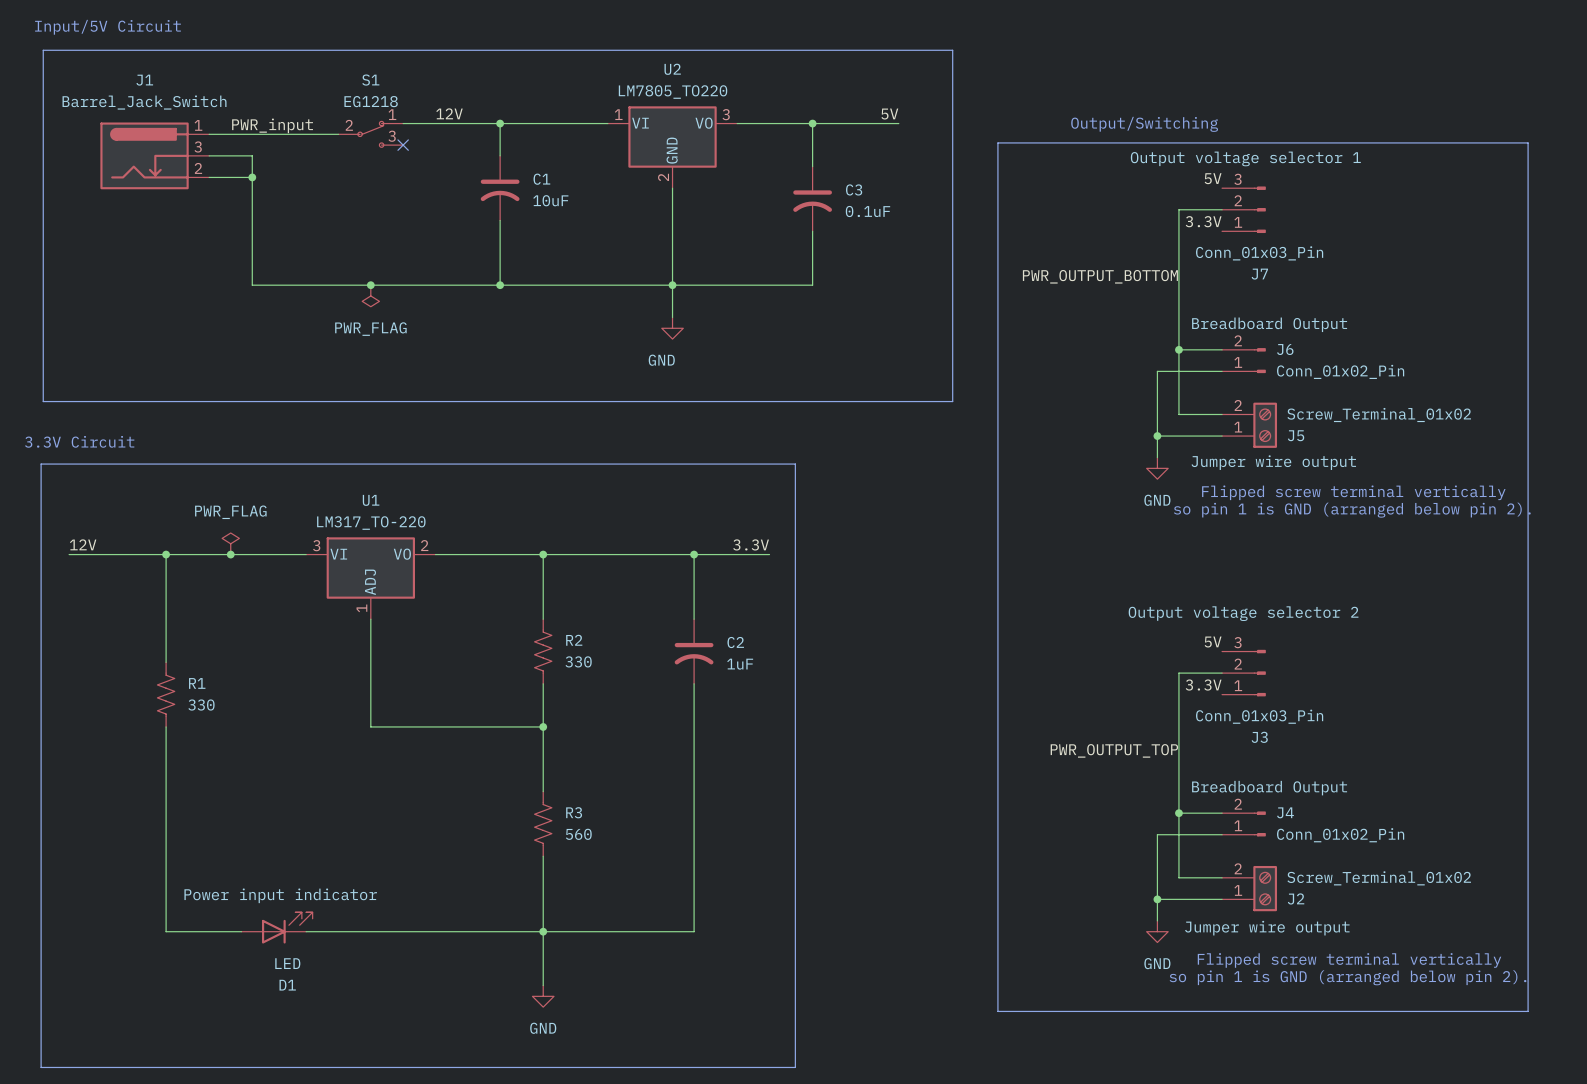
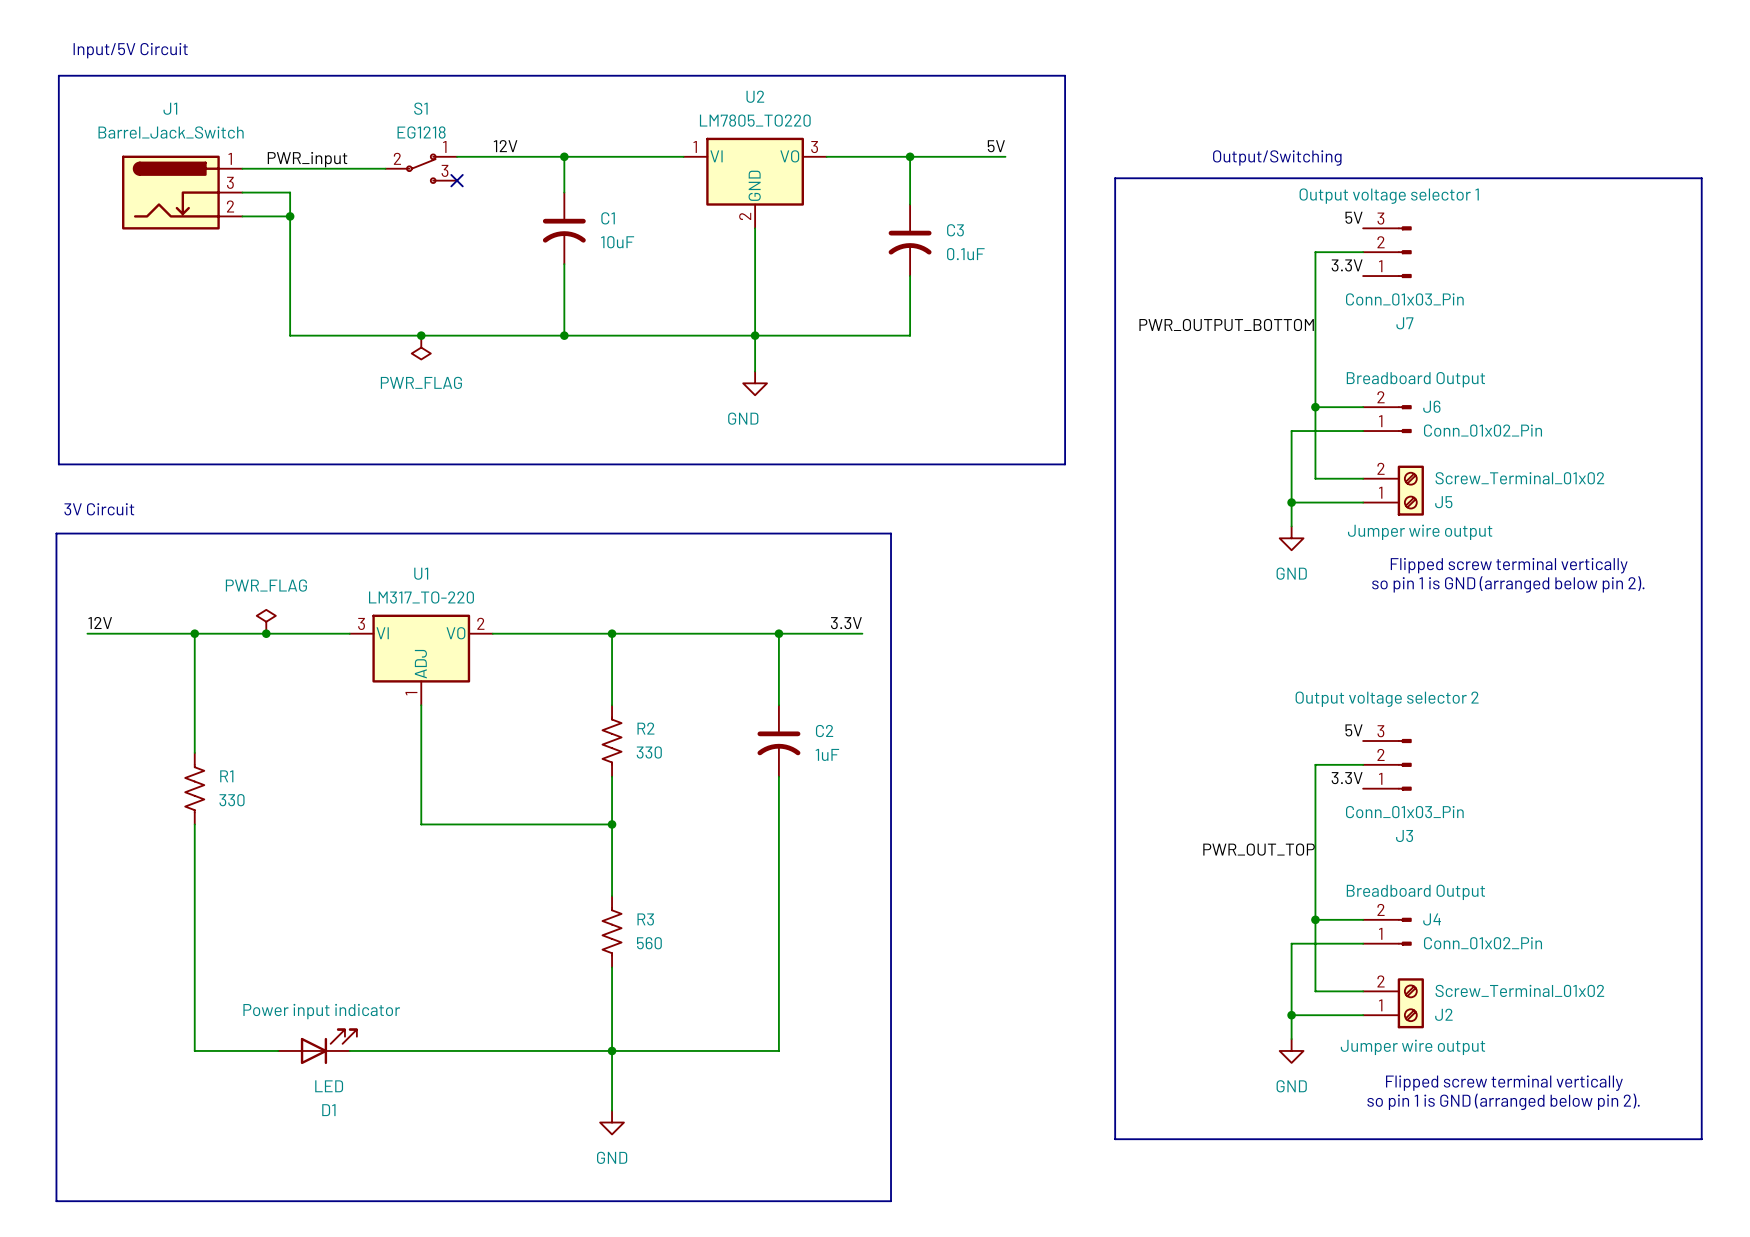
text: 3.3V Circuit (79, 441) -> 3V Circuit (99, 509)
label: PWR_OUTPUT_TOP (1114, 750) -> PWR_OUT_TOP (1259, 849)

